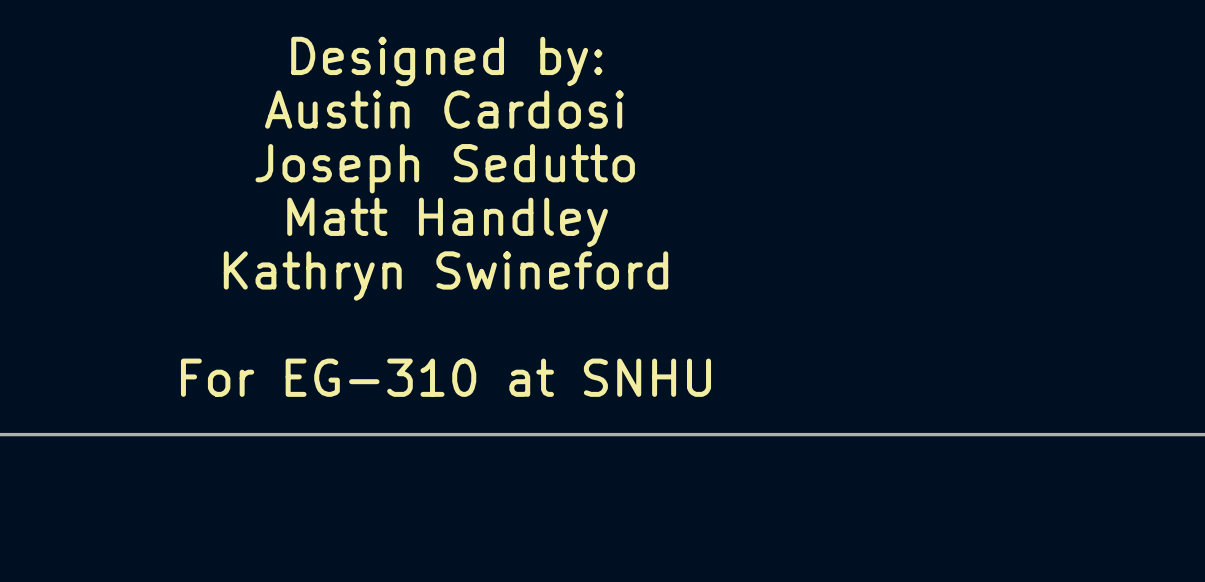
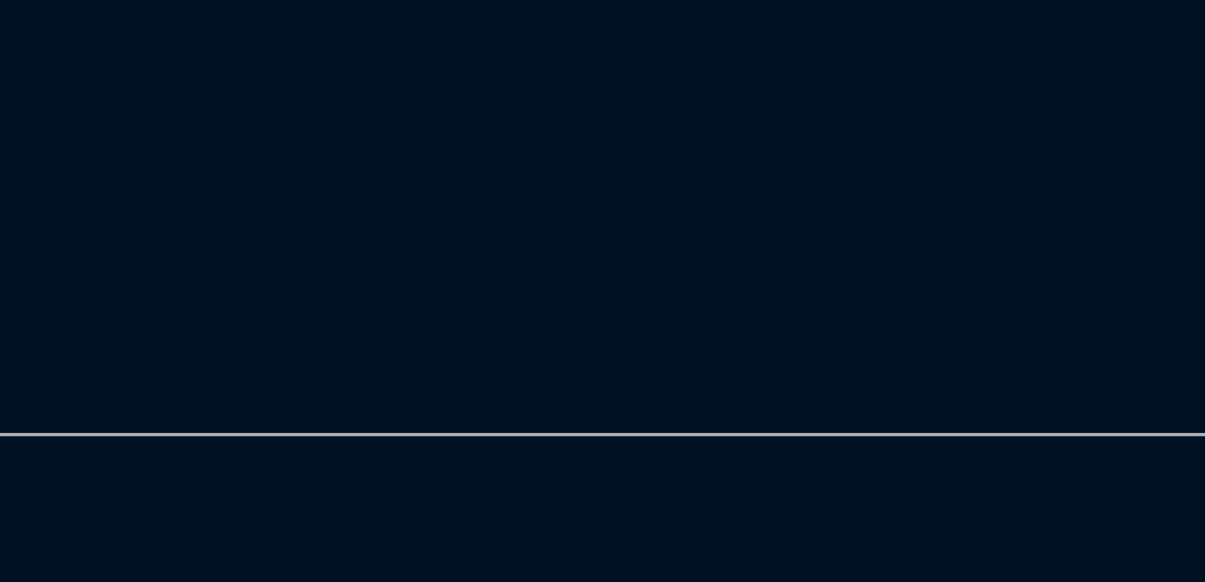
text: Designed by: (446, 61) -> none
text: Austin Cardosi (444, 109) -> none
text: Joseph Sedutto (445, 168) -> none
text: Matt Handley (447, 222) -> none
text: Kathryn Swineford (445, 276) -> none
text: For EG-310 at SNHU (445, 377) -> none

